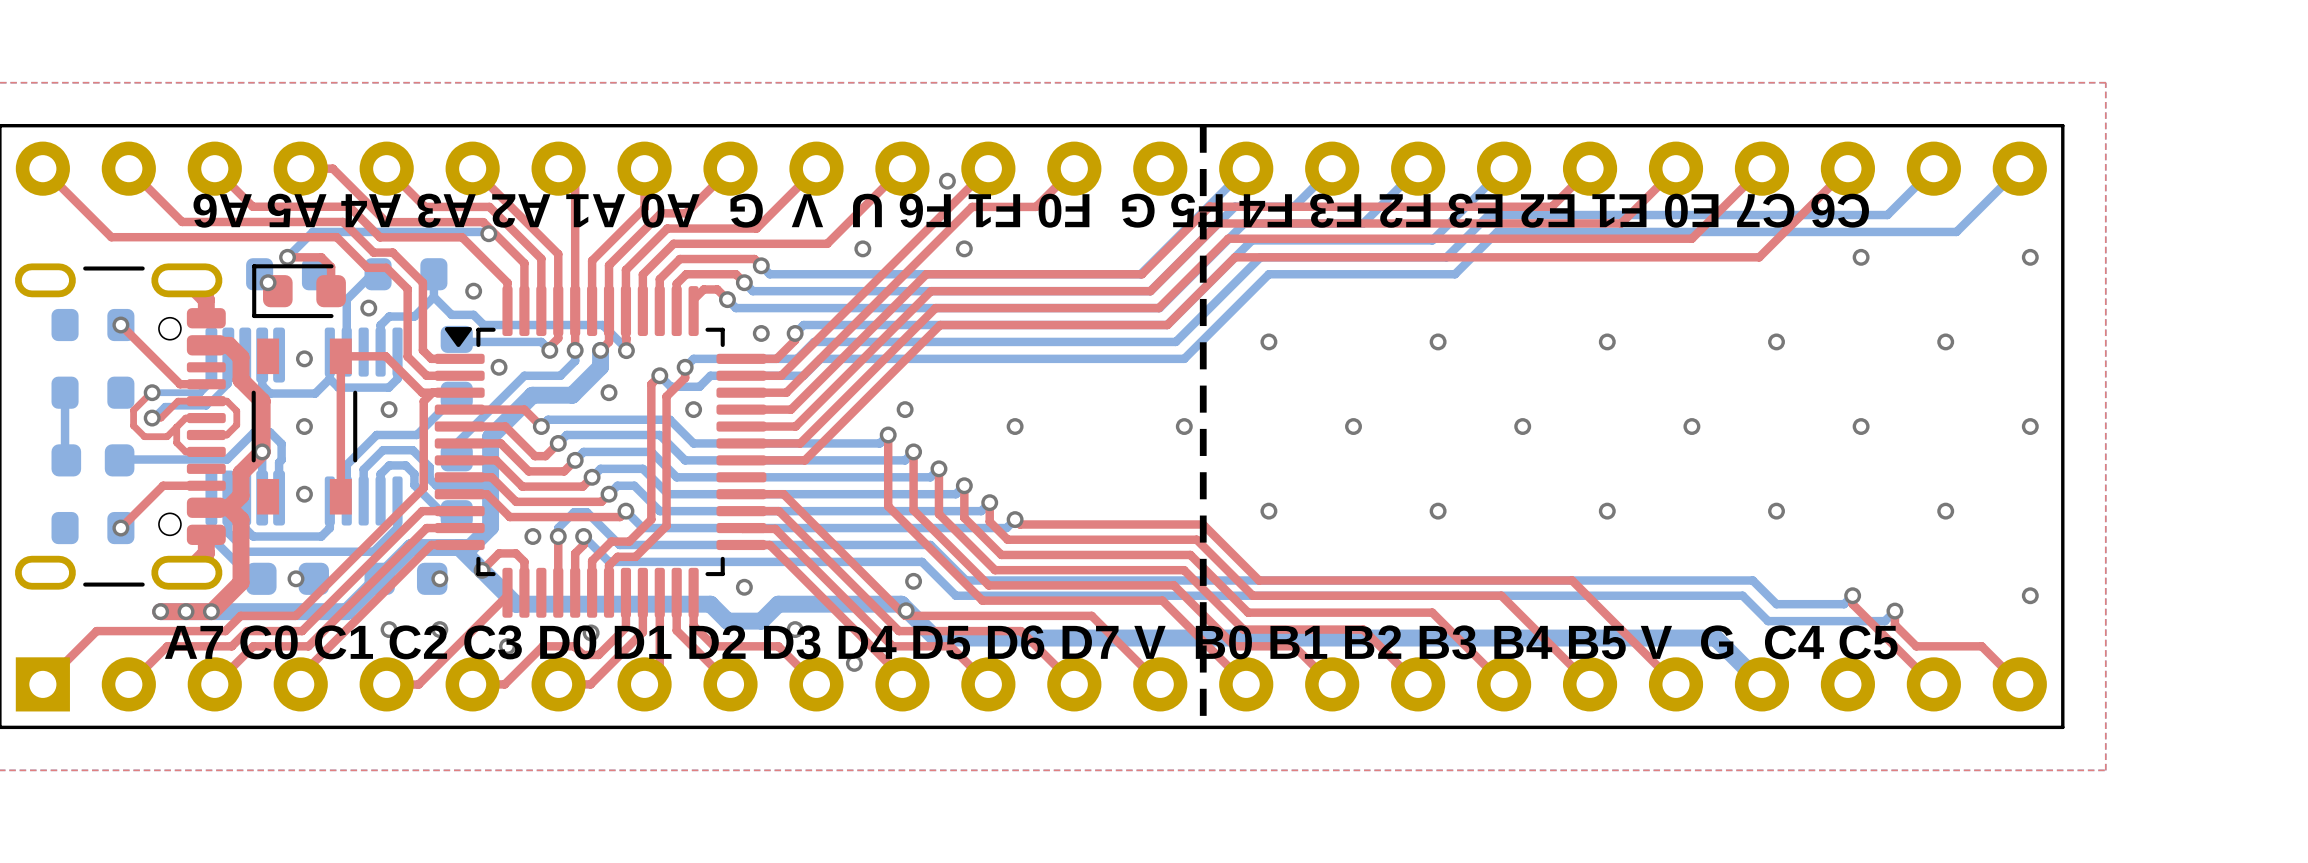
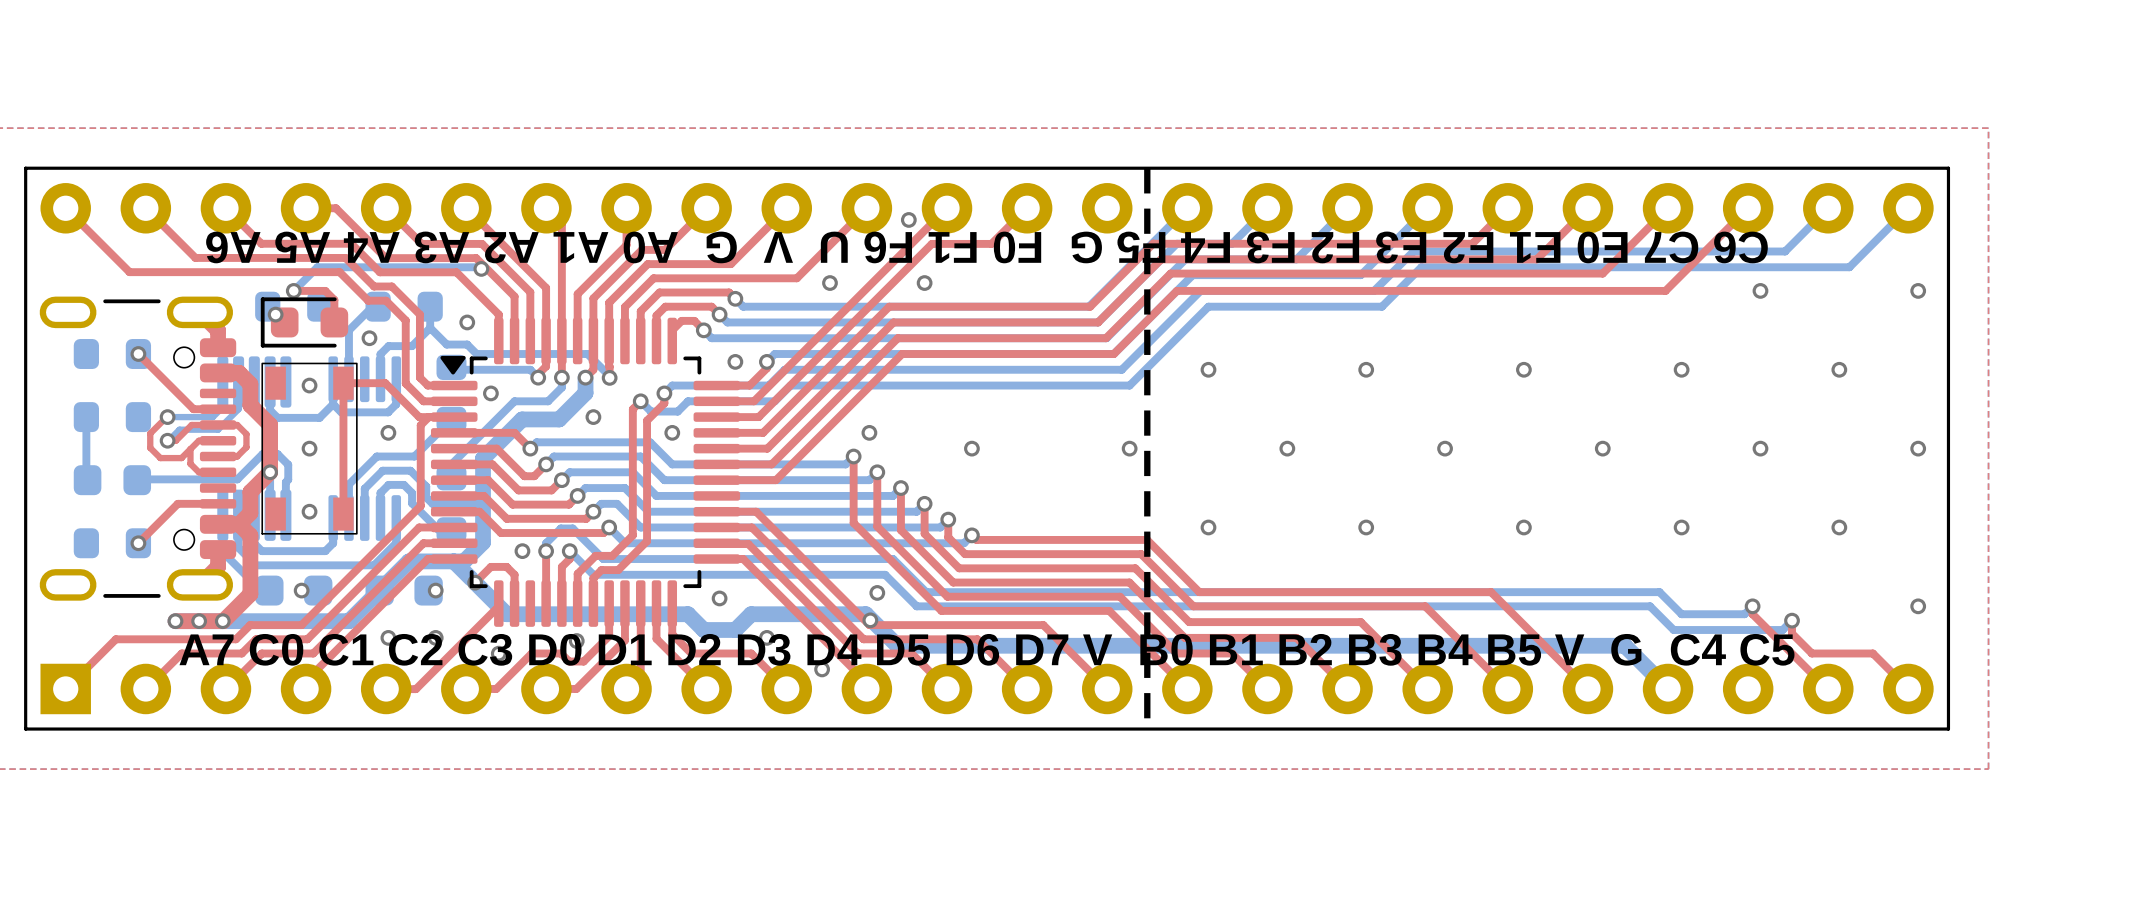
part footprint: [251, 338, 358, 515] -> [261, 362, 358, 535]

